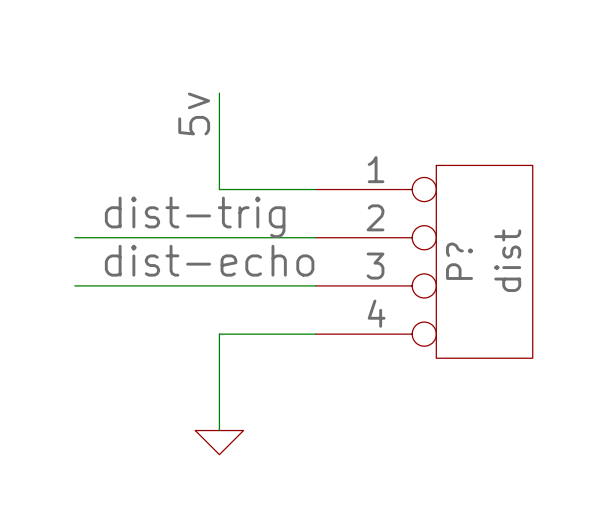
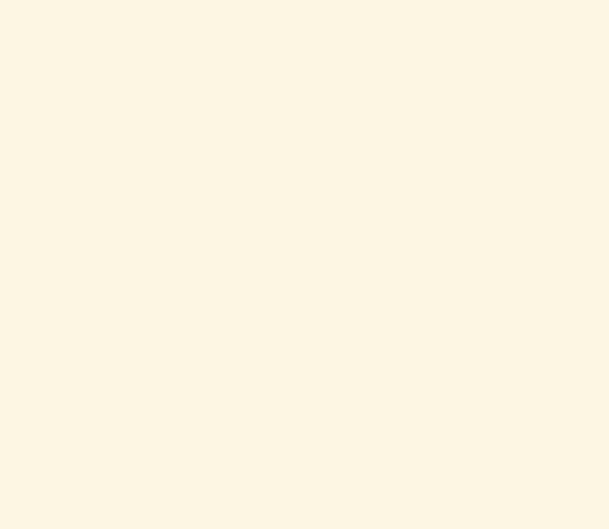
wire: (219, 93) (219, 189) (315, 189) -> none
label: 5v (194, 113) -> none
label: dist-trig (195, 217) -> none
wire: (74, 237) (315, 237) -> none
label: dist-echo (209, 260) -> none
P?: dist (424, 261) -> none
wire: (74, 285) (315, 285) -> none
wire: (315, 334) (219, 334) (219, 430) -> none
power symbol: (219, 442) -> none

